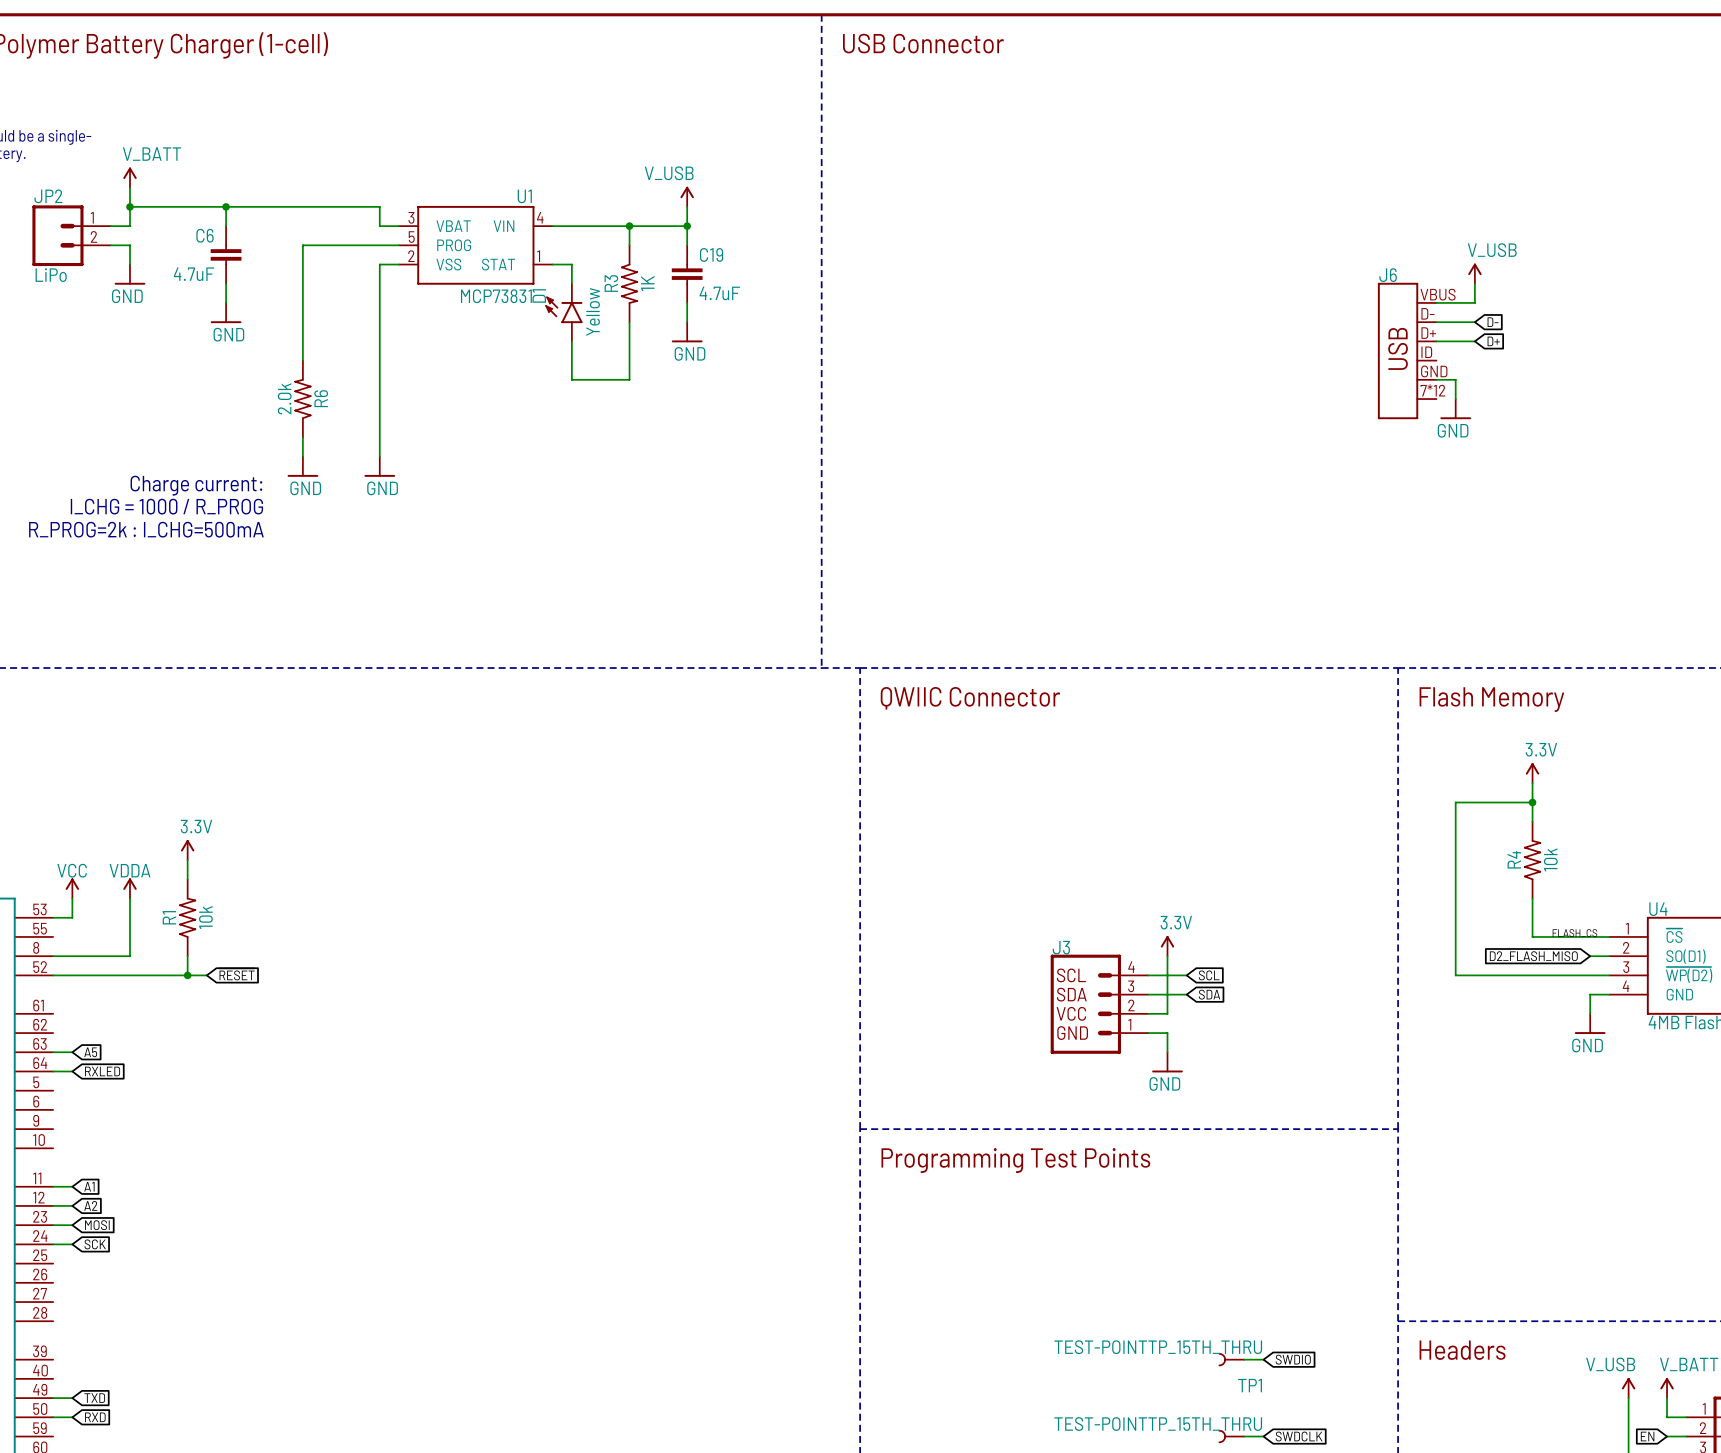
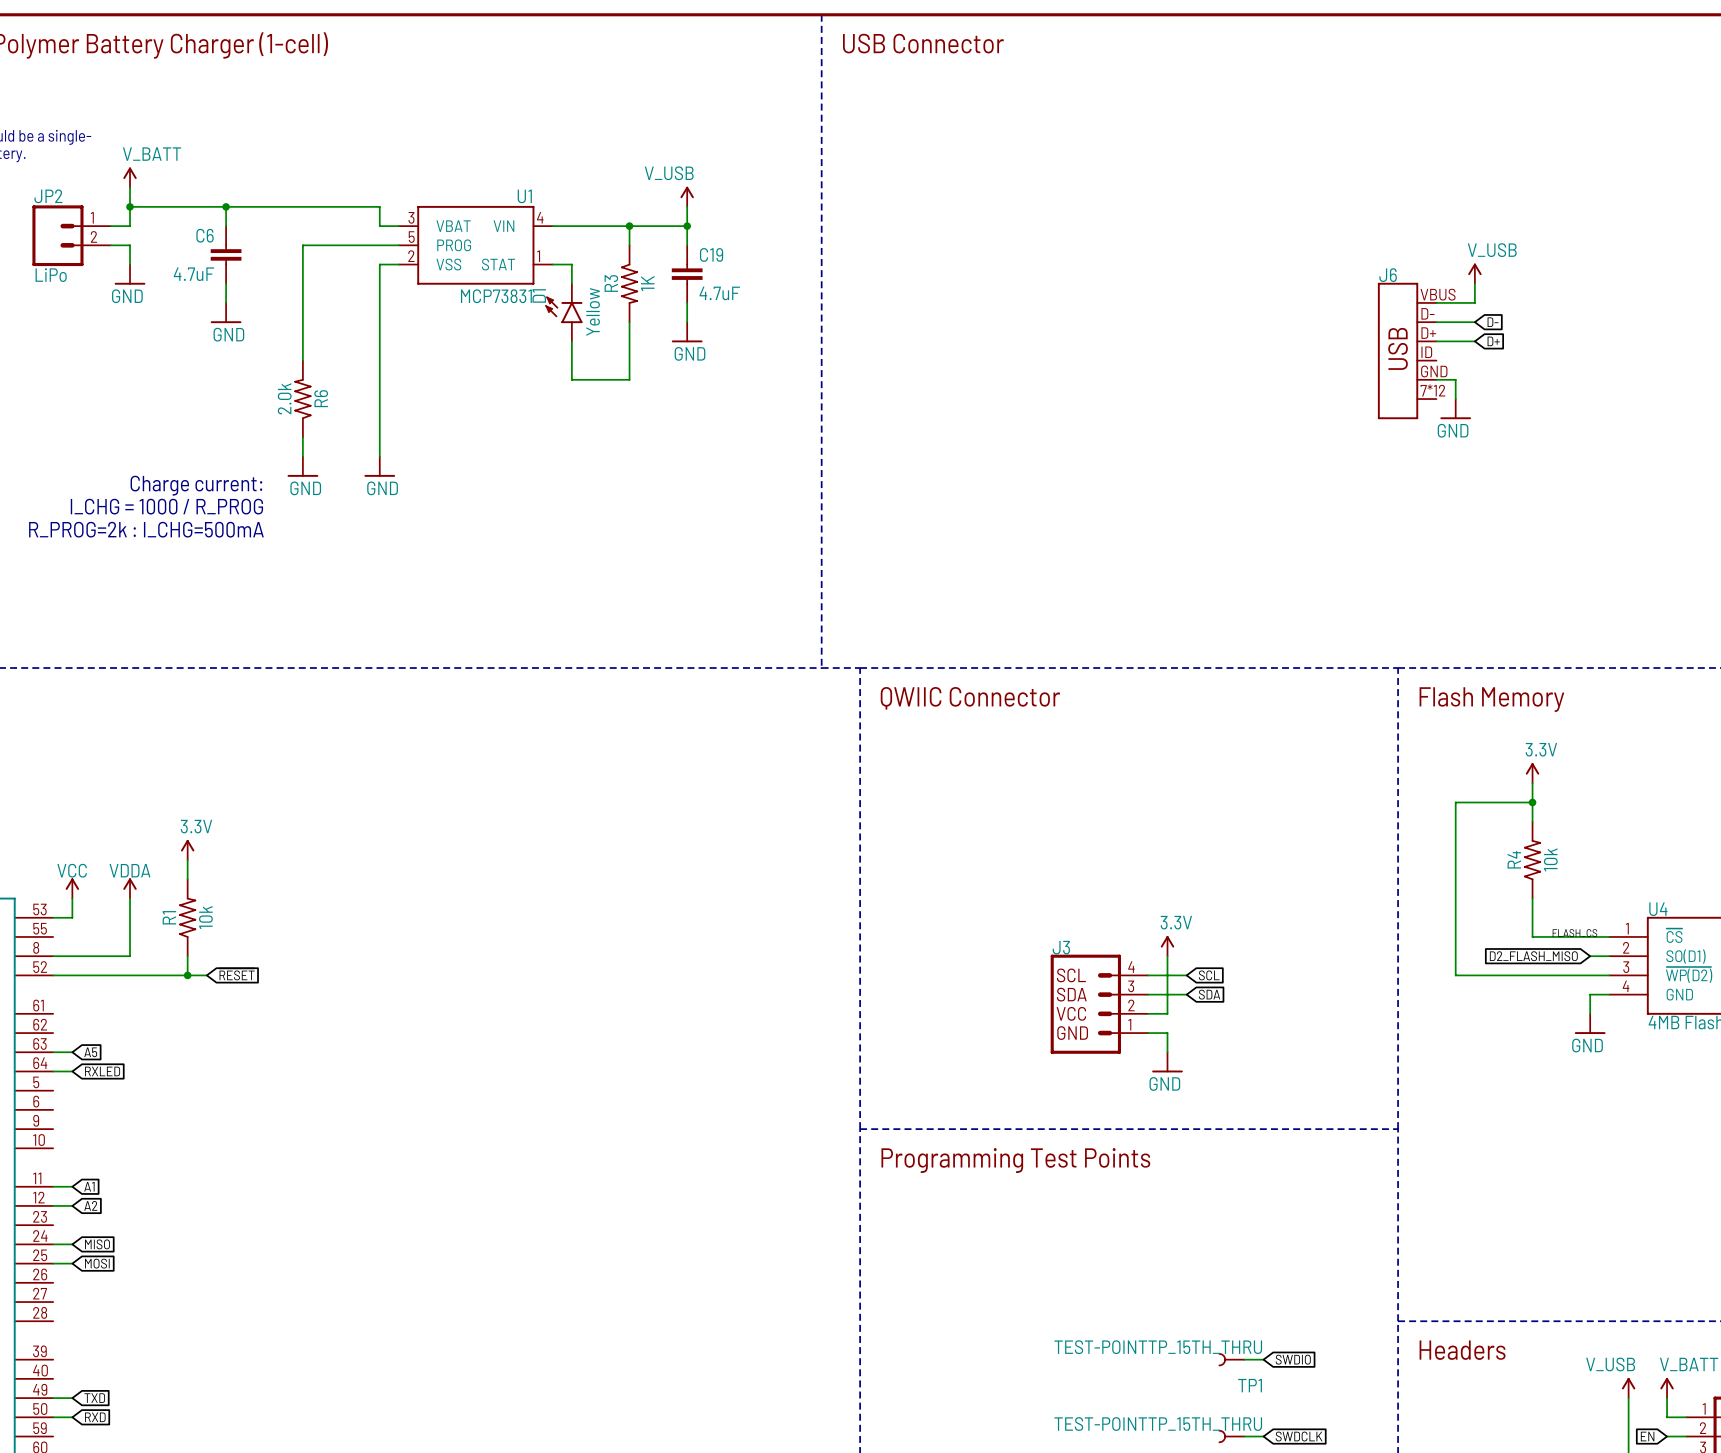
wire: (53, 1225) (72, 1225) -> (53, 1263) (72, 1263)
global label position: MOSI (97, 1225) -> MOSI (97, 1263)
global label: SCK (95, 1244) -> MISO (97, 1244)

